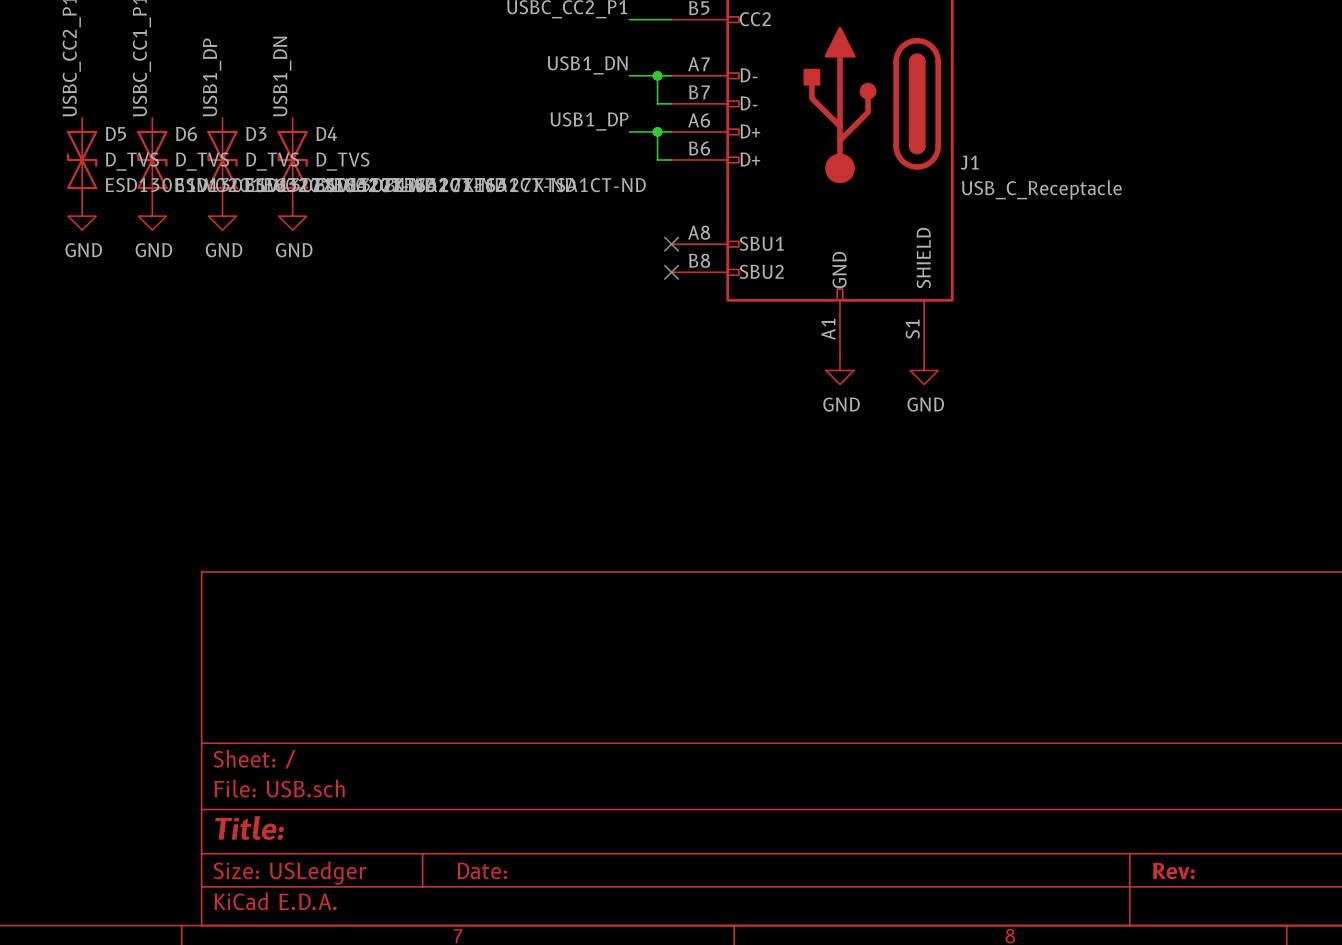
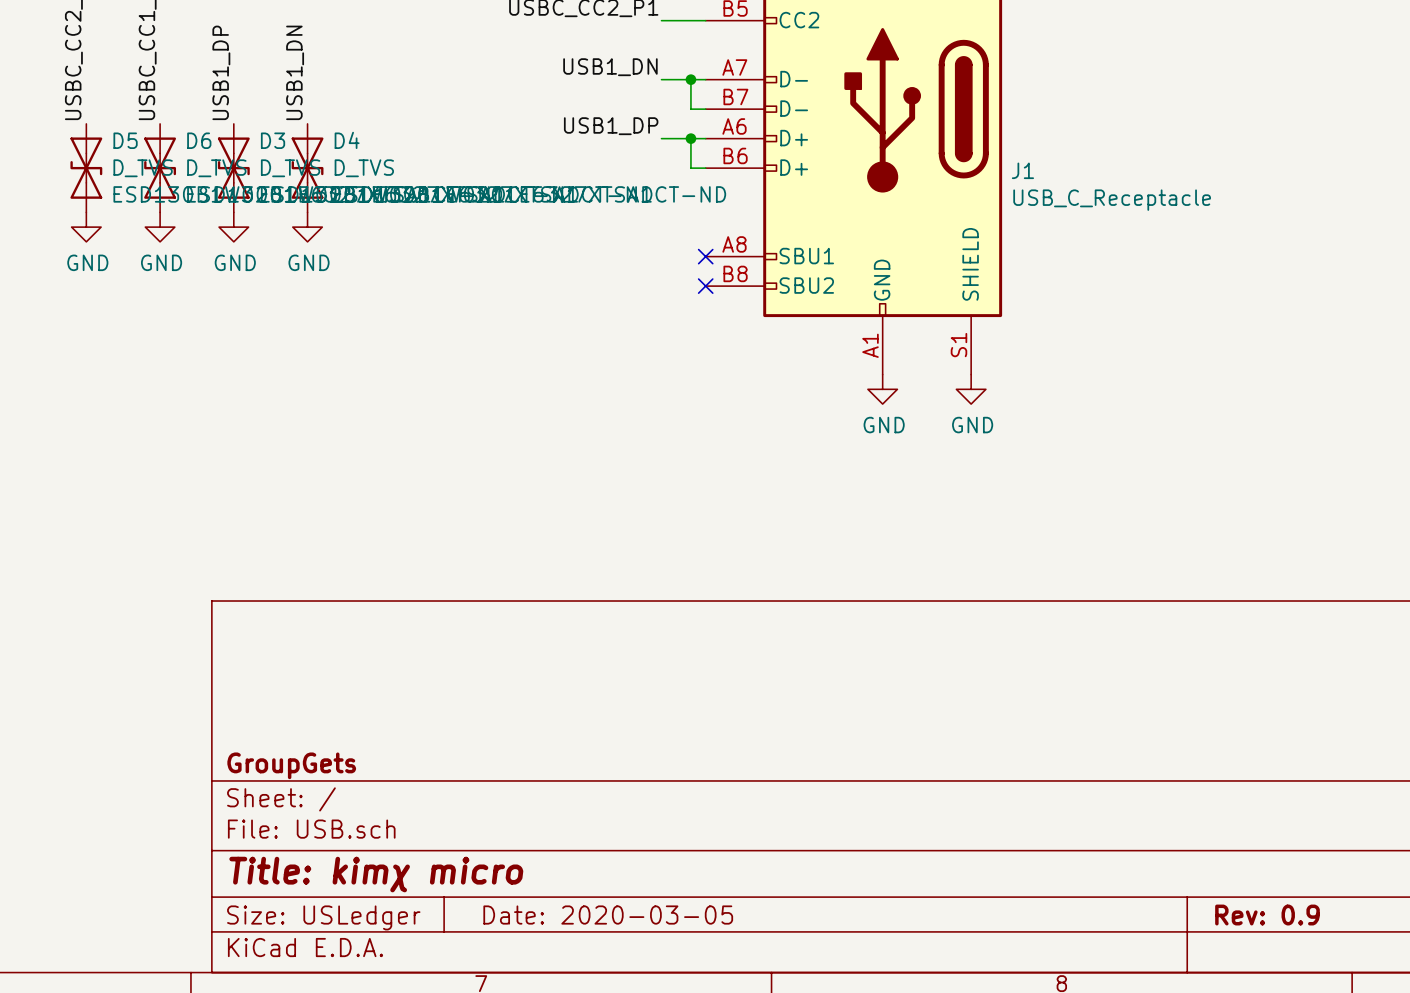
title block: none -> GroupGets (291, 765)
title block: Title: (249, 827) -> Title: kimχ micro (376, 874)
title block: Date: (482, 870) -> Date: 2020-03-05 (608, 915)
title block: Rev: (1173, 871) -> Rev: 0.9 (1267, 915)

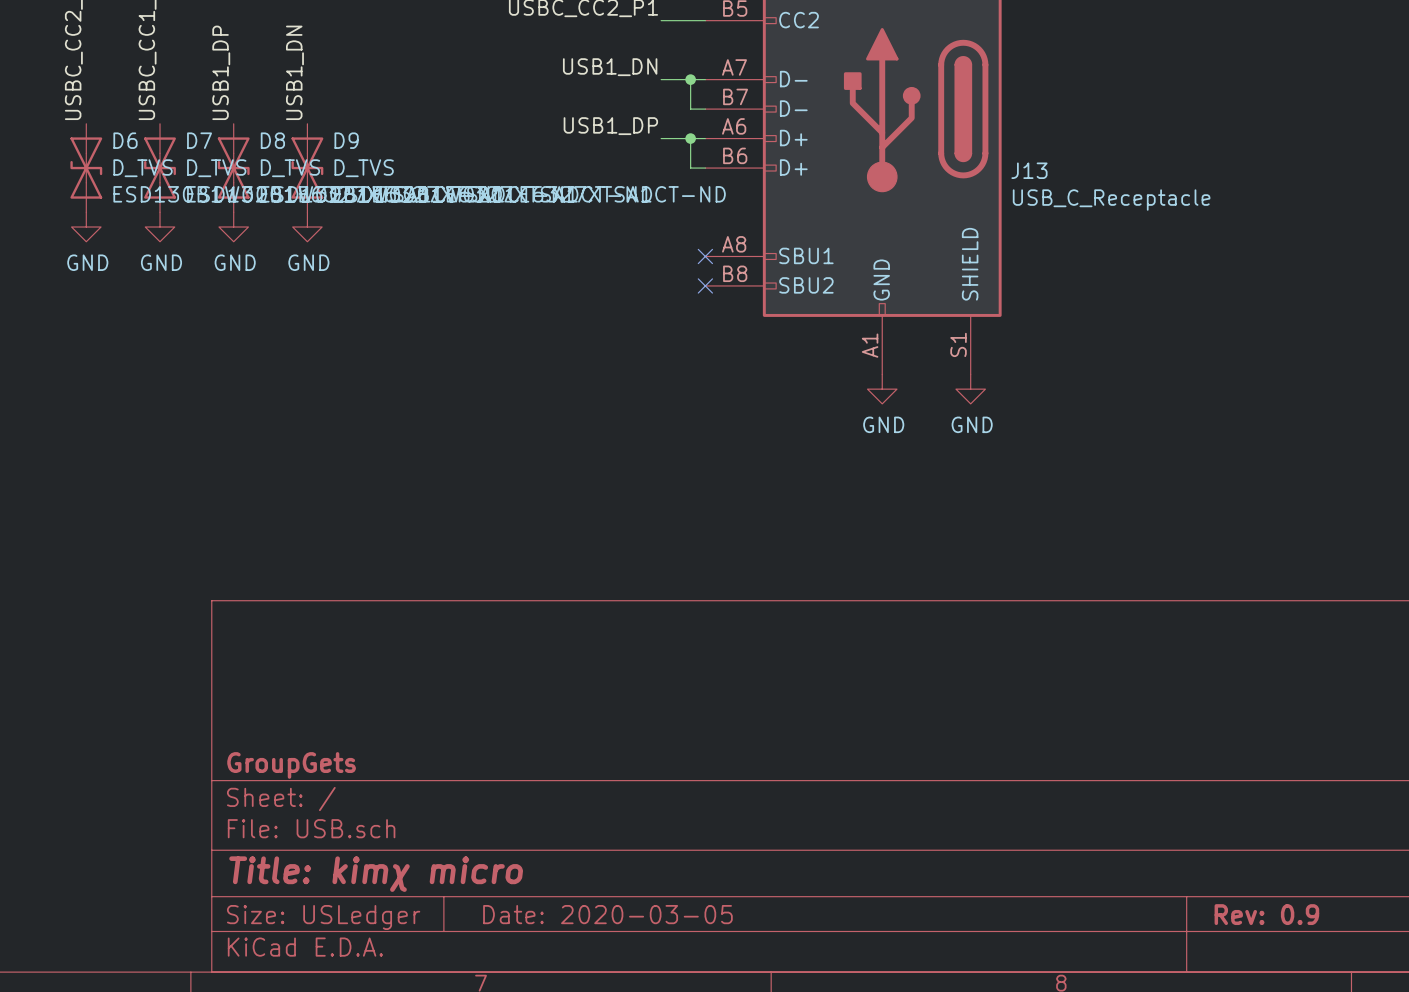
D5 name: D5 (125, 140) -> D6 (125, 140)
D6 name: D6 (199, 140) -> D7 (199, 140)
D3 name: D3 (273, 140) -> D8 (272, 140)
D4 name: D4 (347, 140) -> D9 (346, 140)
J1 name: J1 (1022, 170) -> J13 (1029, 170)

